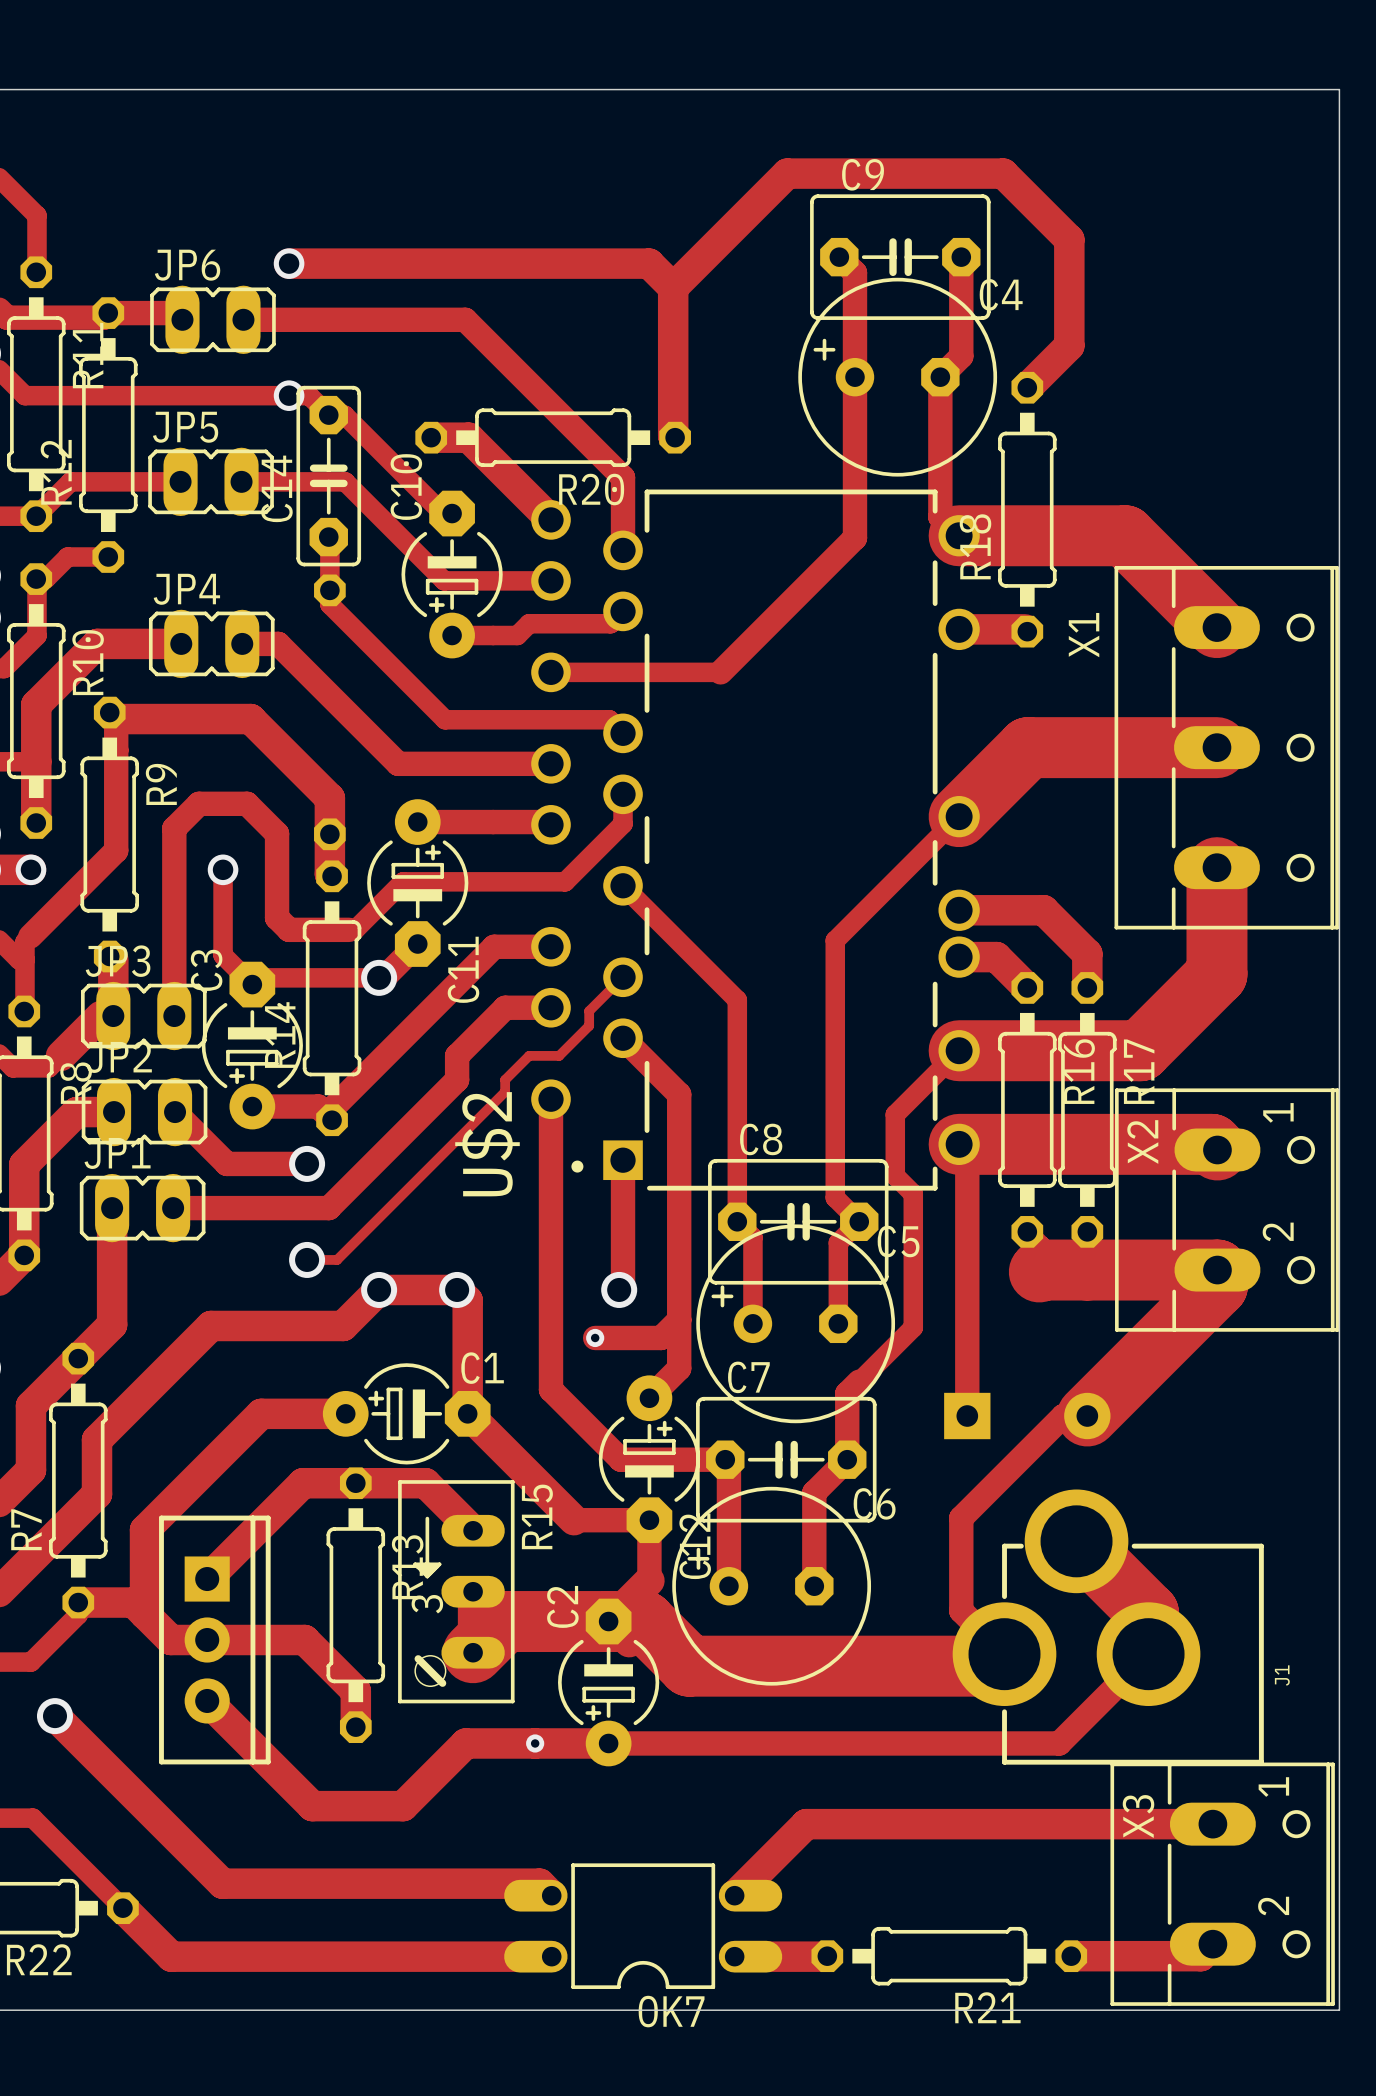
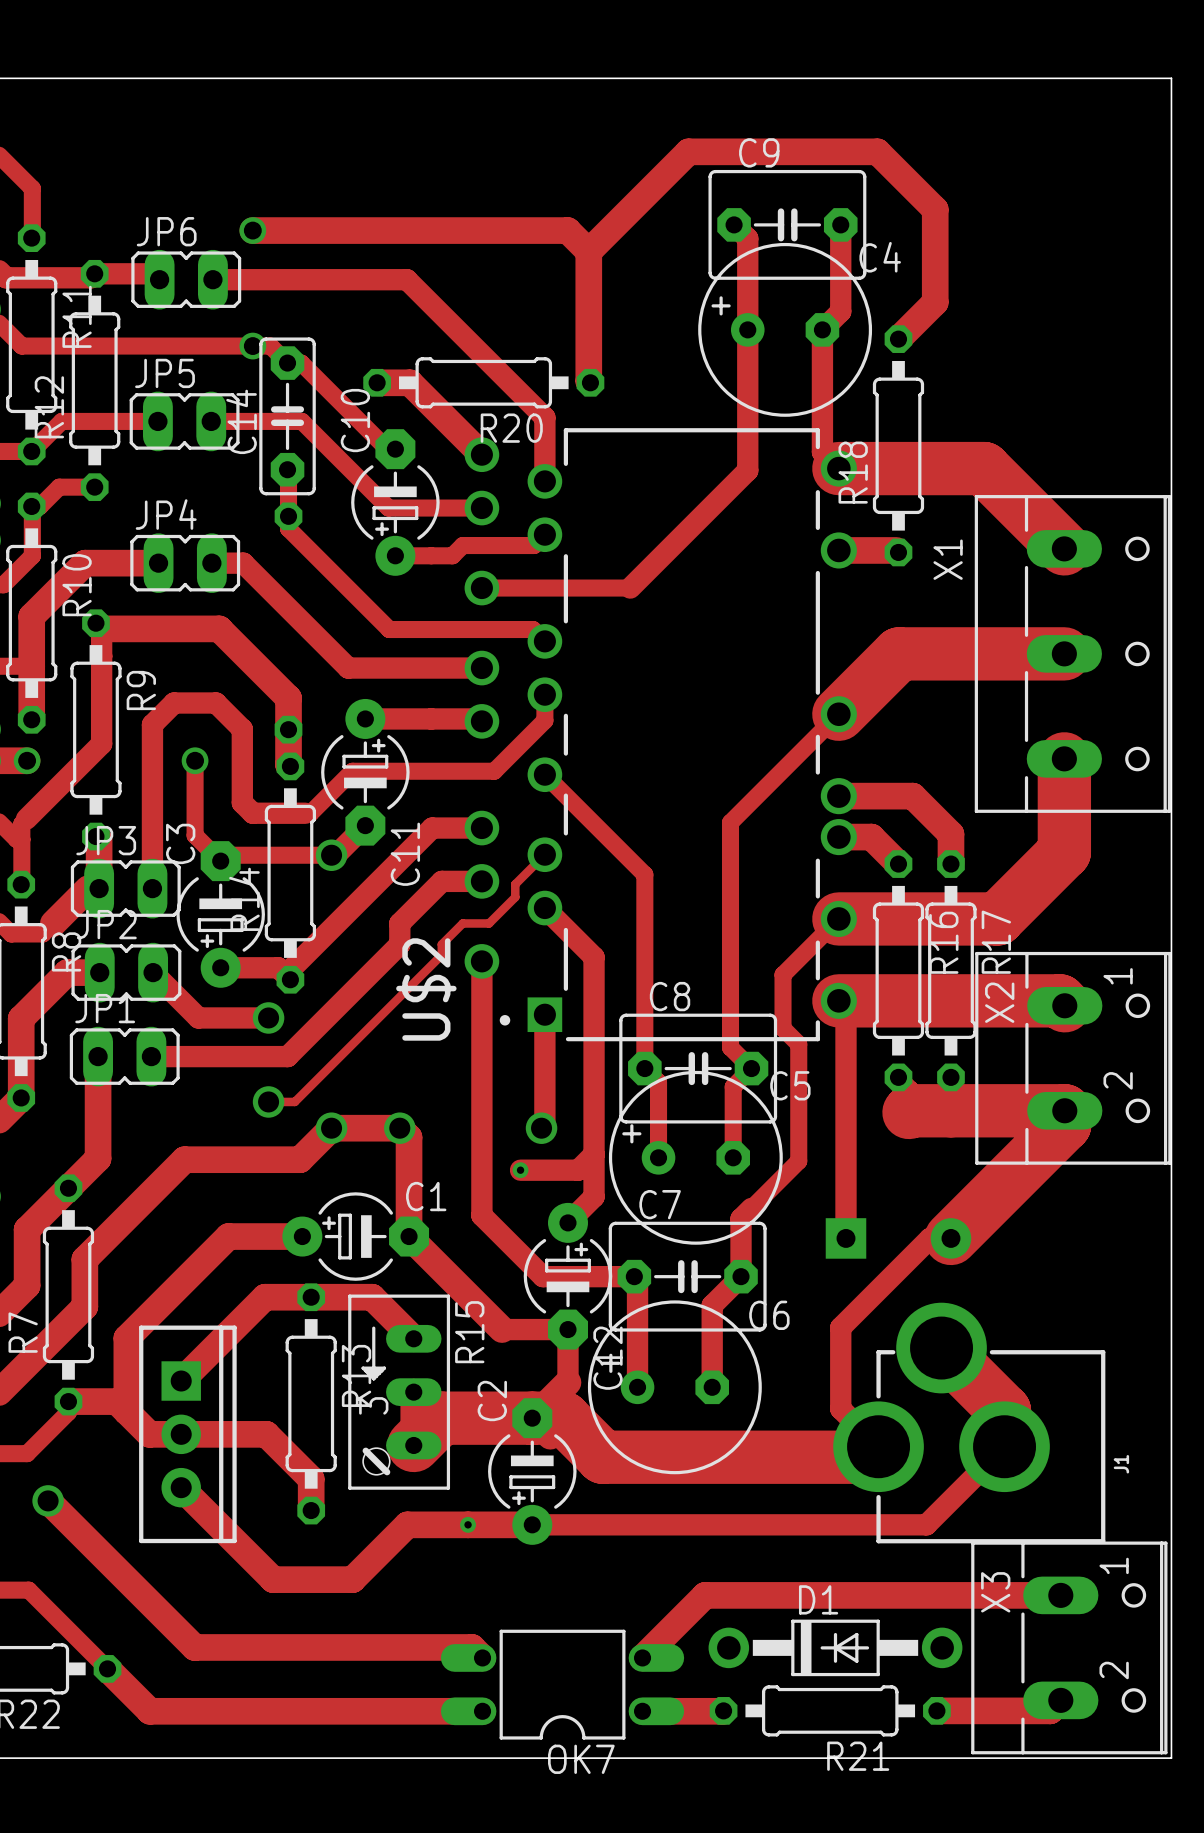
D1: none -> (835, 1647)

